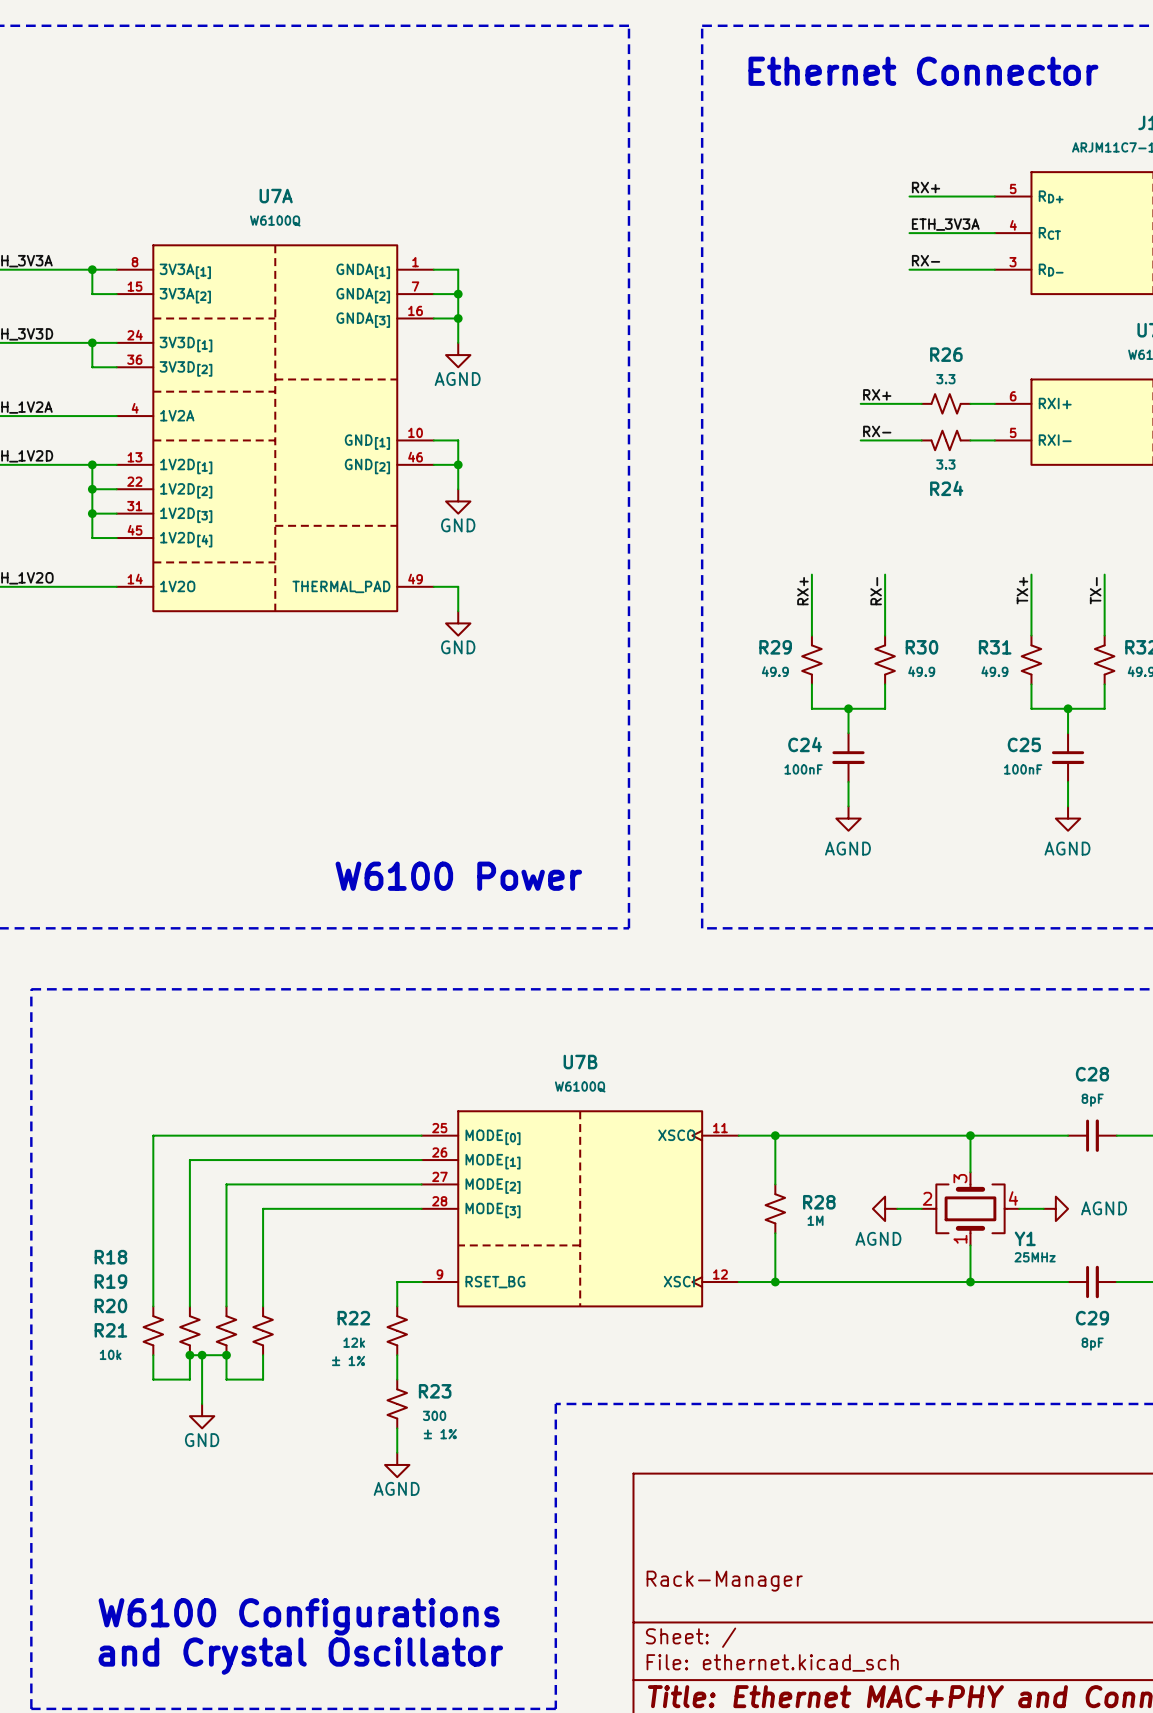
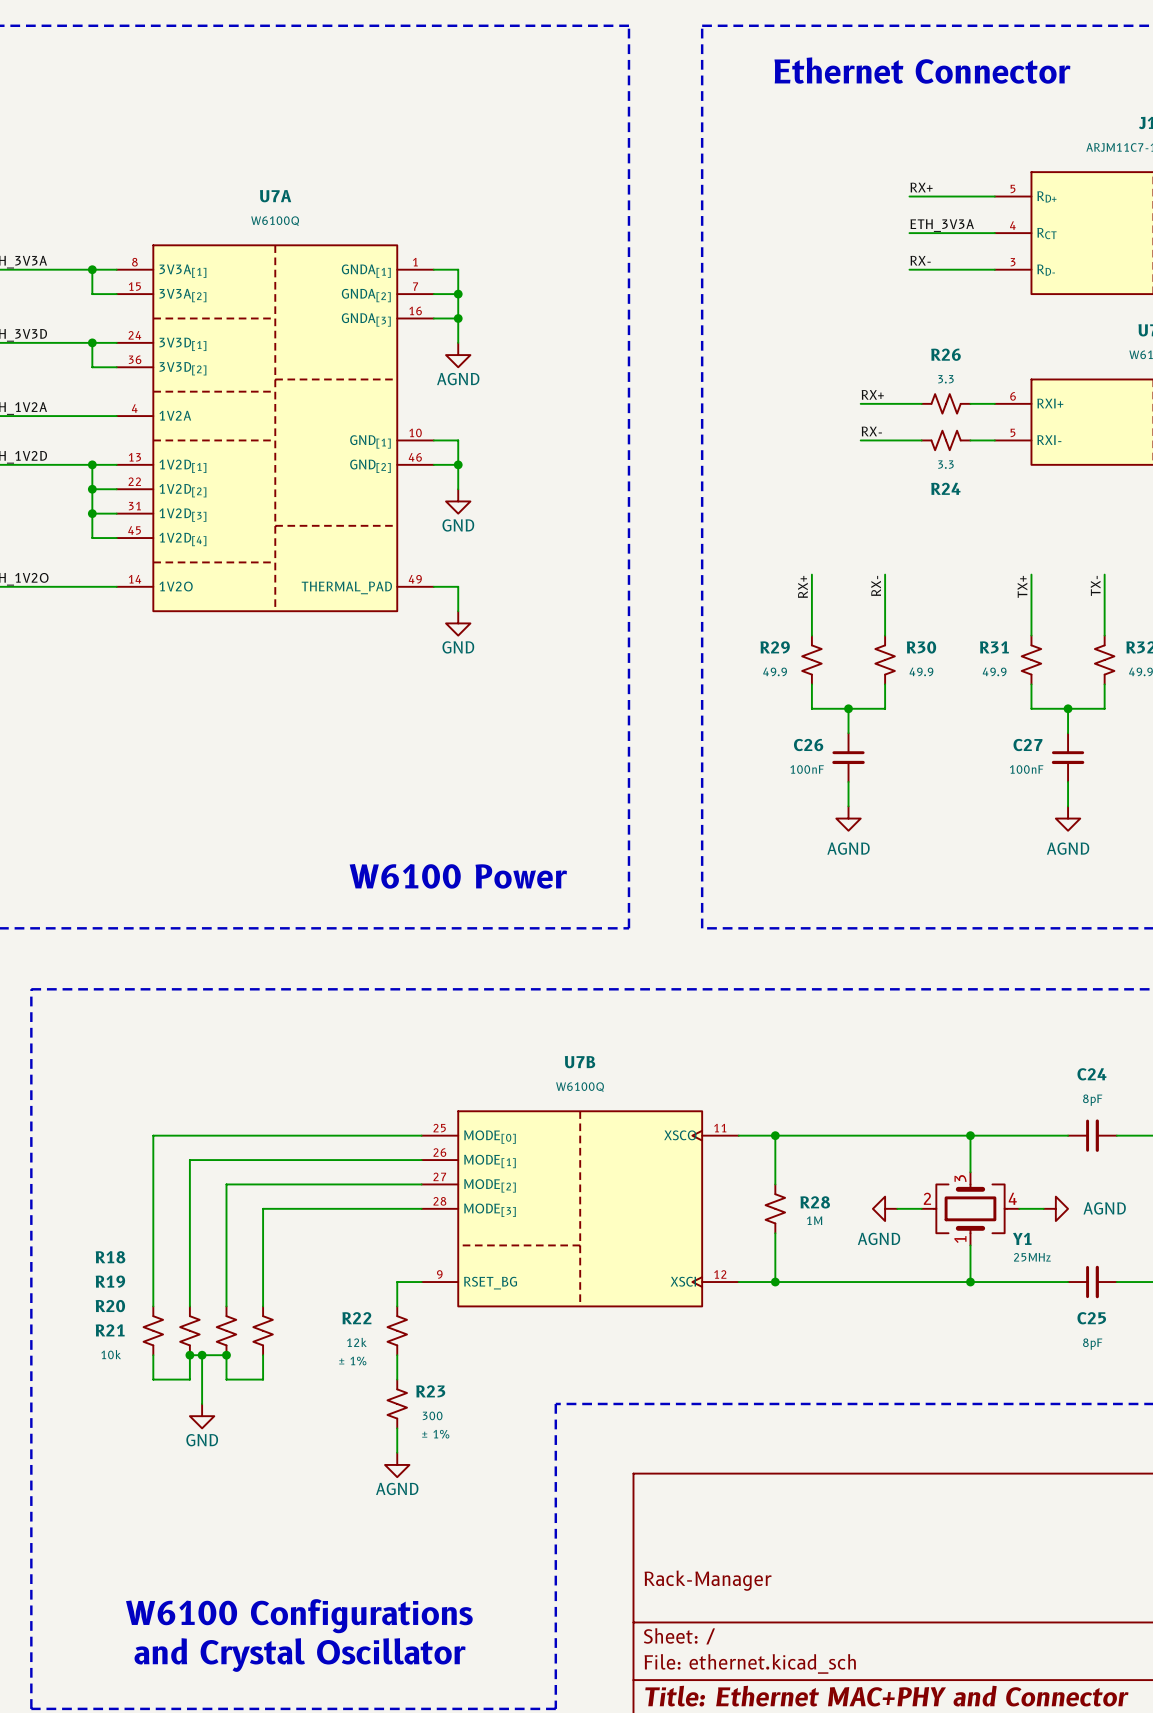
C24 name: C24 (805, 744) -> C26 (808, 745)
C25 name: C25 (1024, 744) -> C27 (1027, 745)
C28 name: C28 (1092, 1074) -> C24 (1091, 1074)
C29 name: C29 (1092, 1318) -> C25 (1091, 1318)

